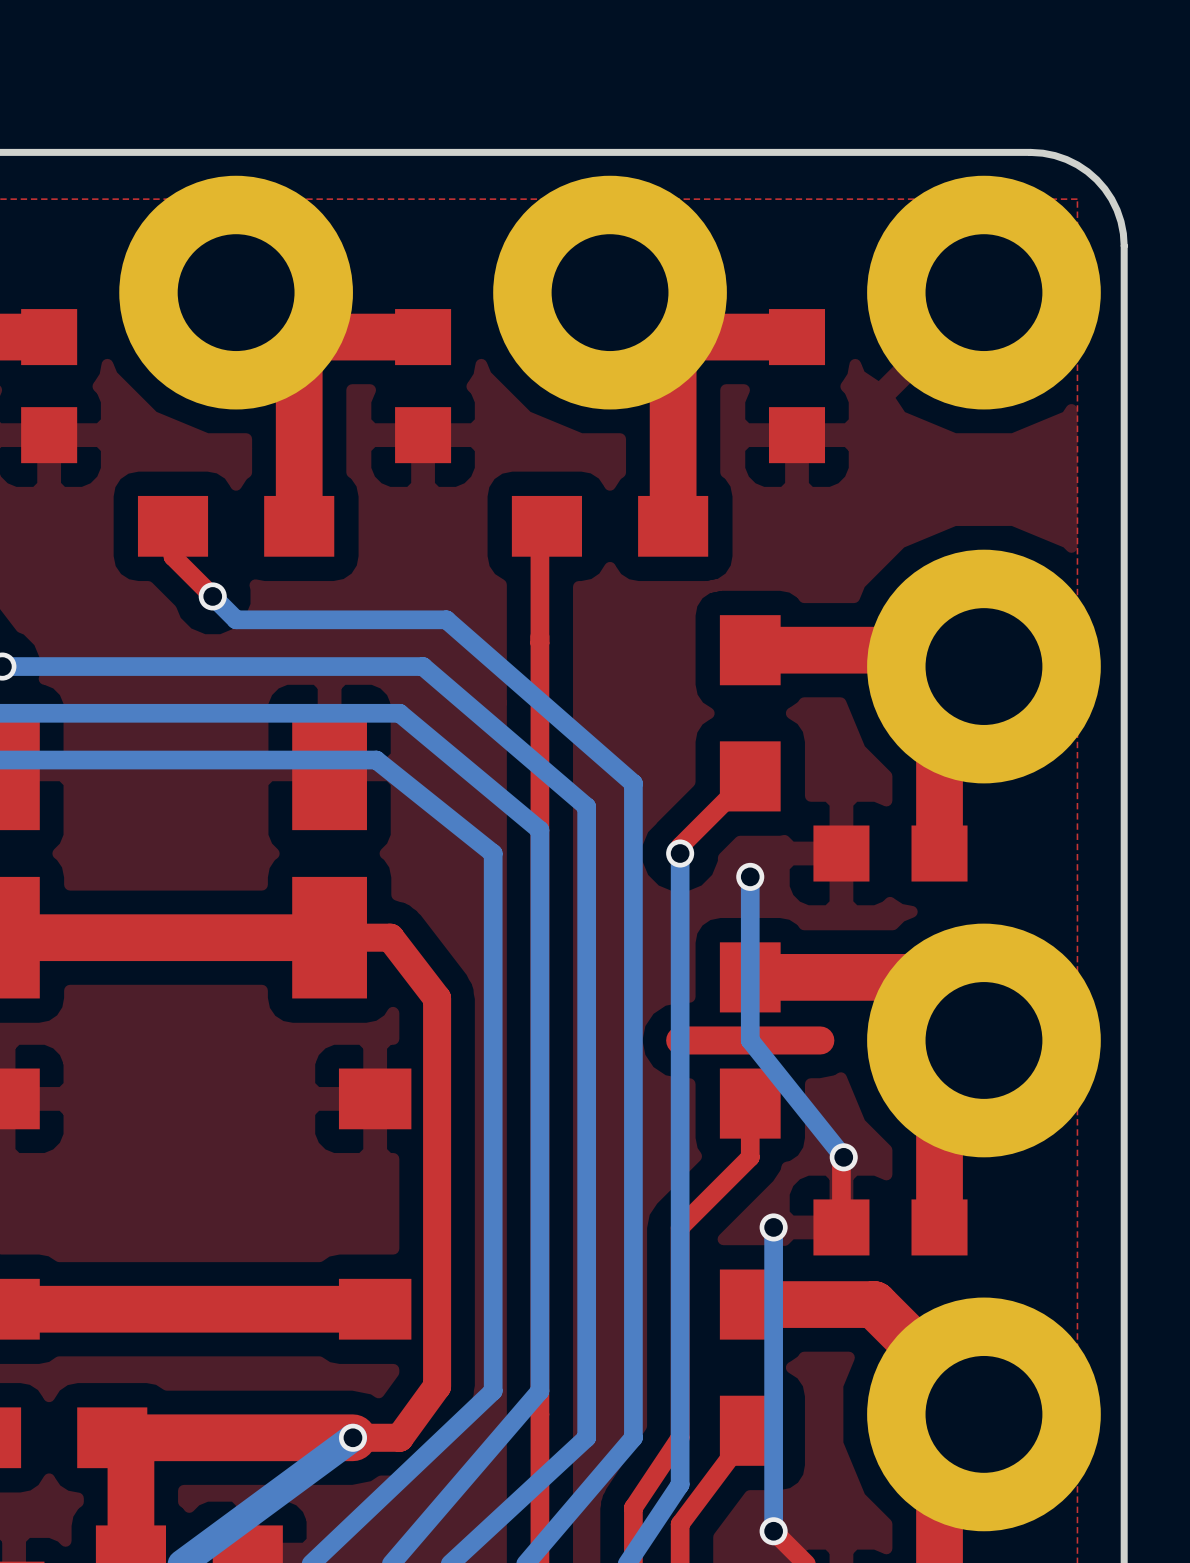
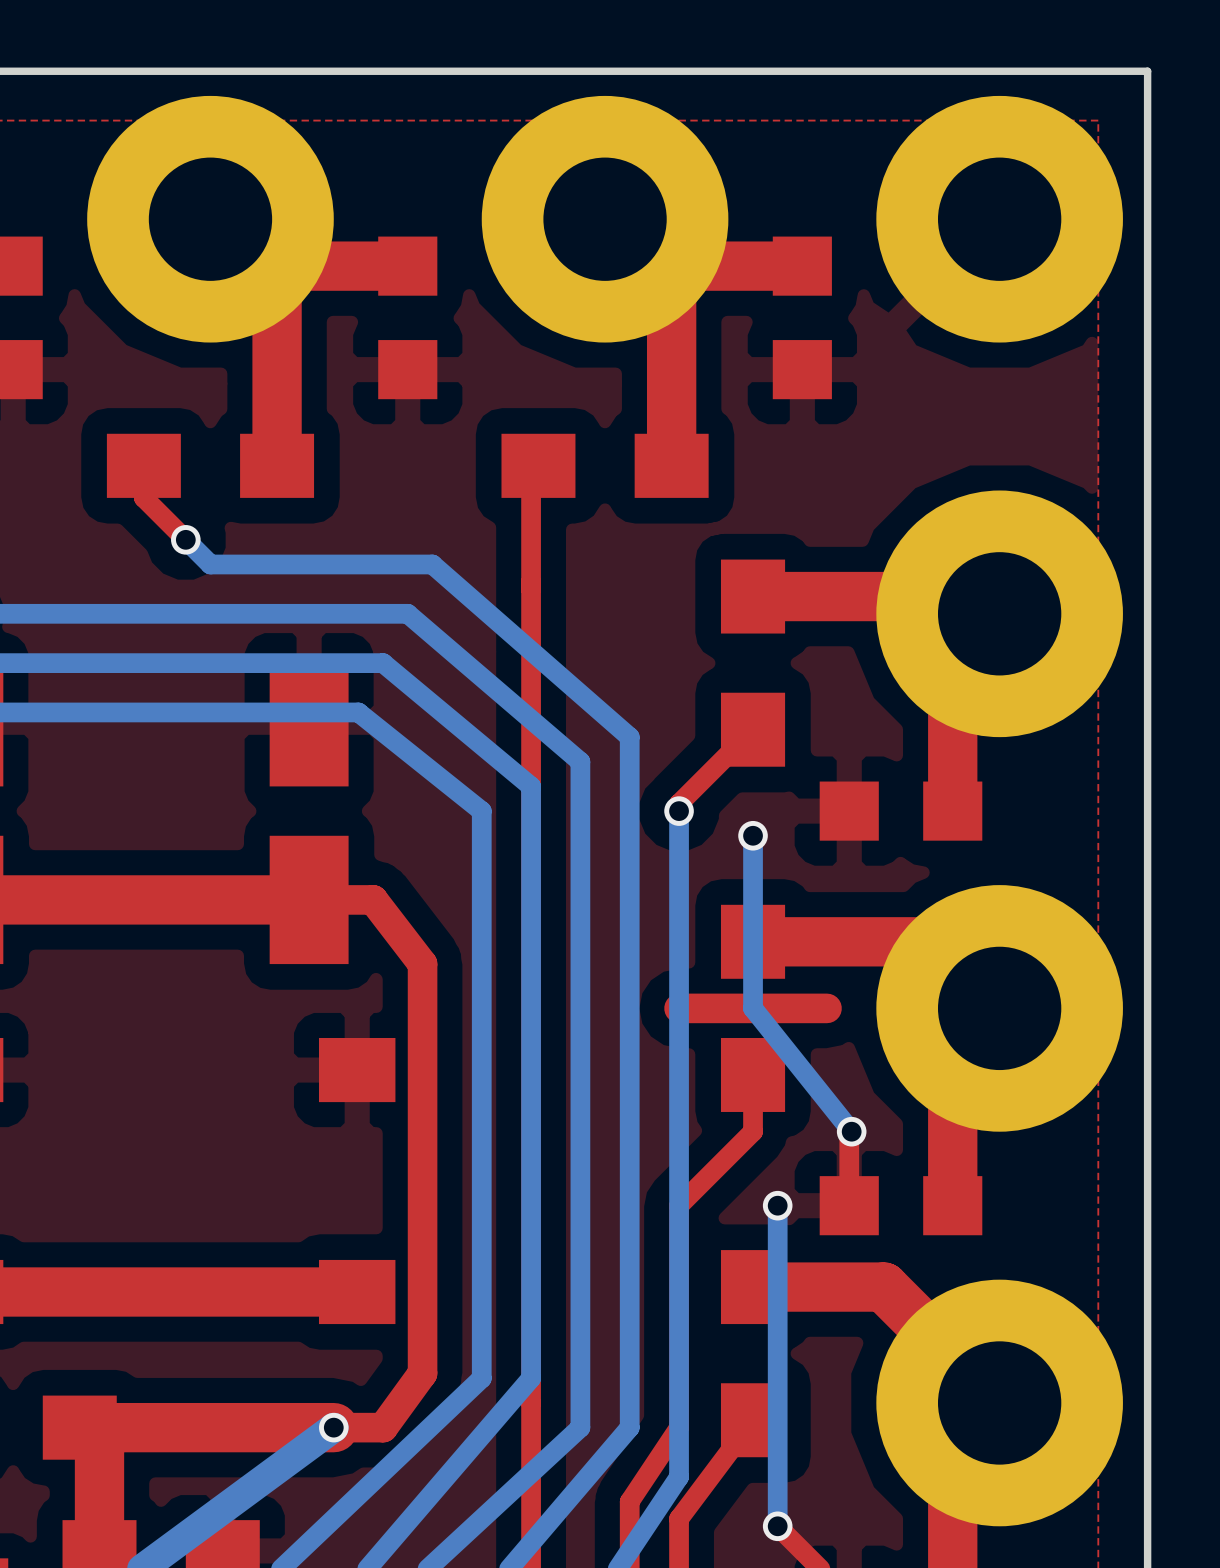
board edge: (1030, 152) (1054, 155) (1066, 159) (1087, 171) (1096, 179) (1104, 188) (1117, 210) (1123, 233) (1124, 245) -> (1048, 71) (1147, 71) (1147, 169)

